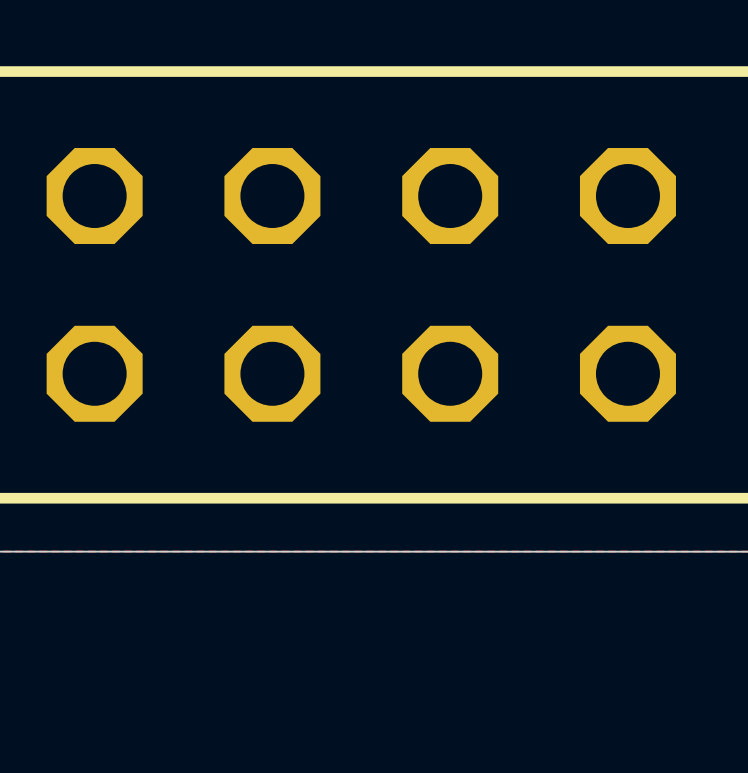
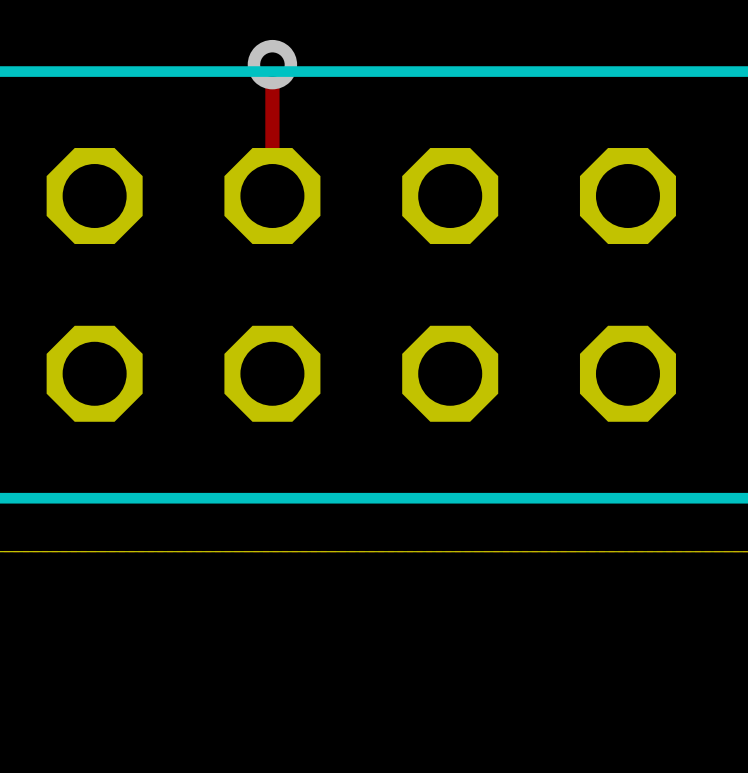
track: none -> (272, 64) (272, 196)
via: none -> (272, 64)

